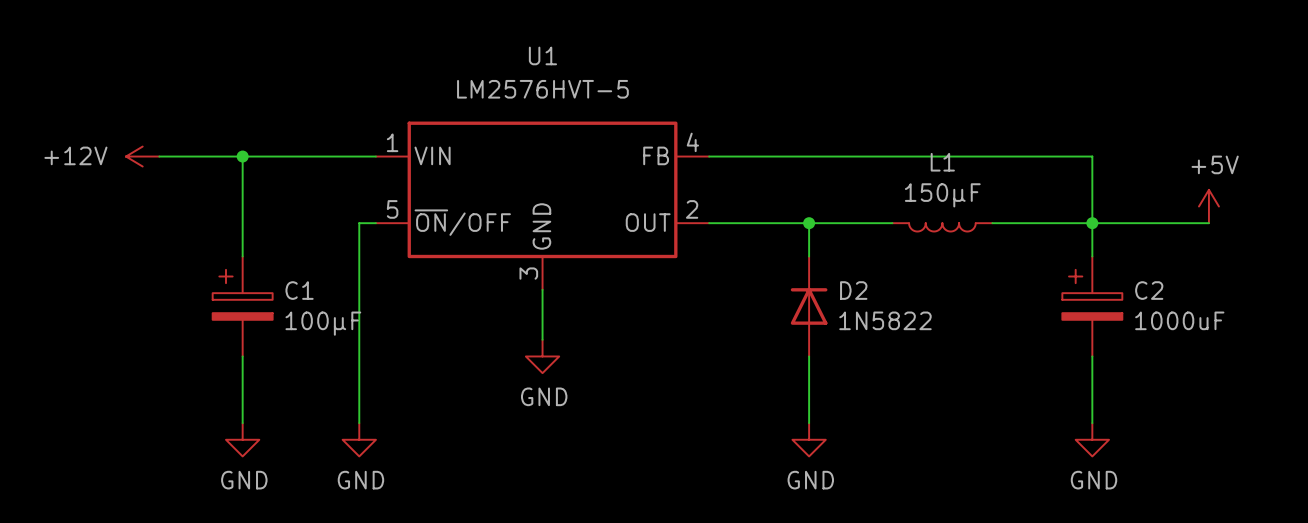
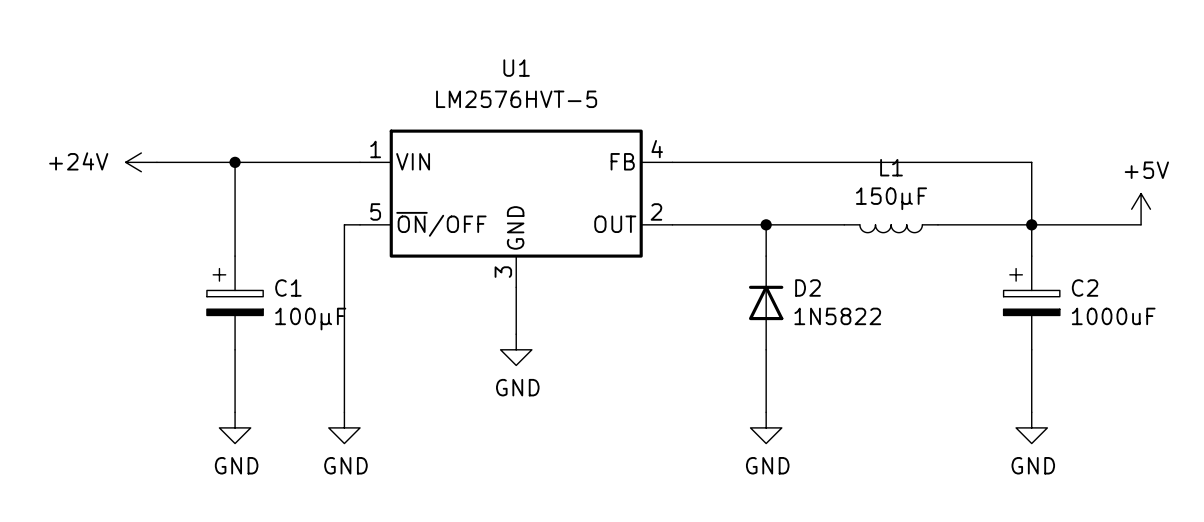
power symbol: +12V (142, 156) -> +24V (141, 162)

